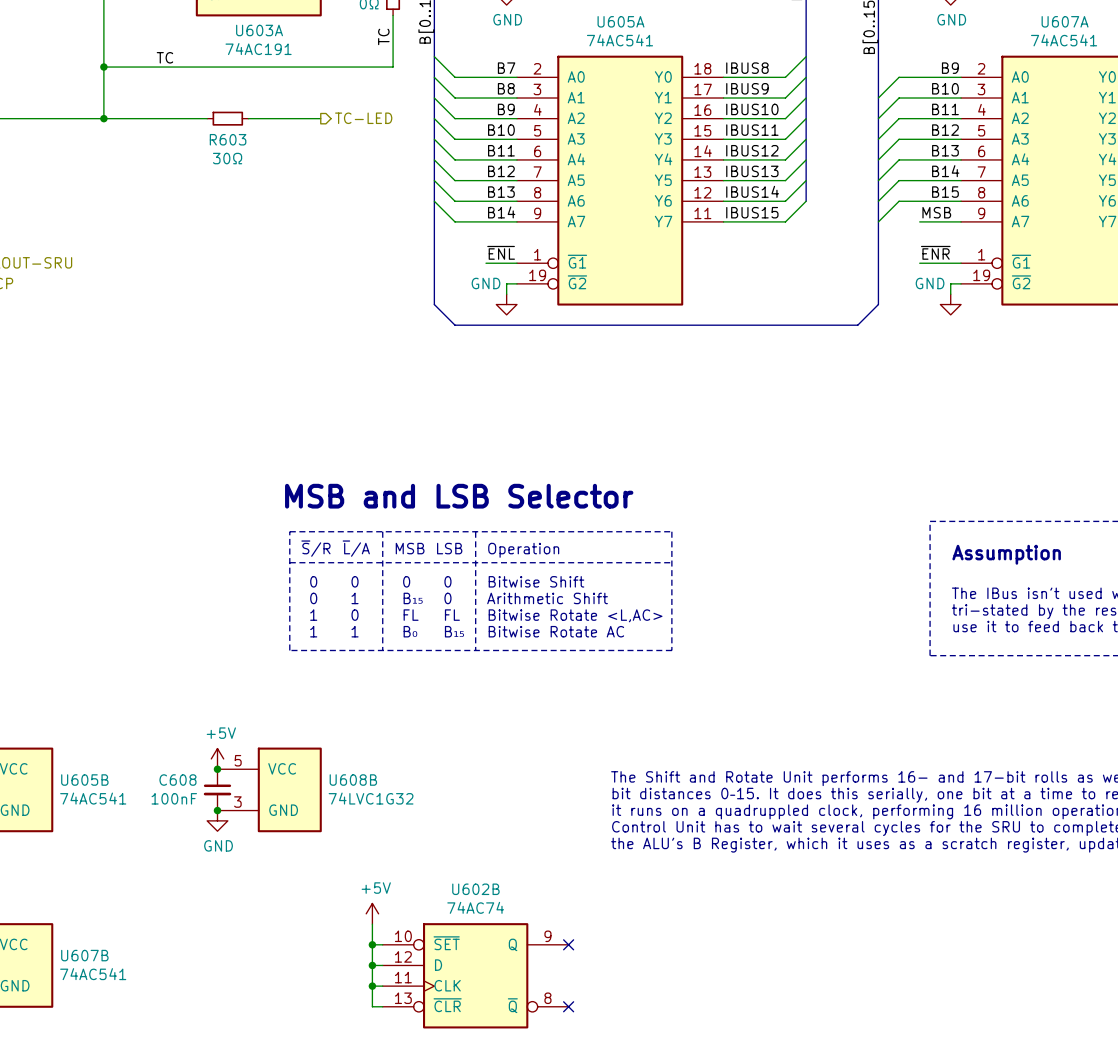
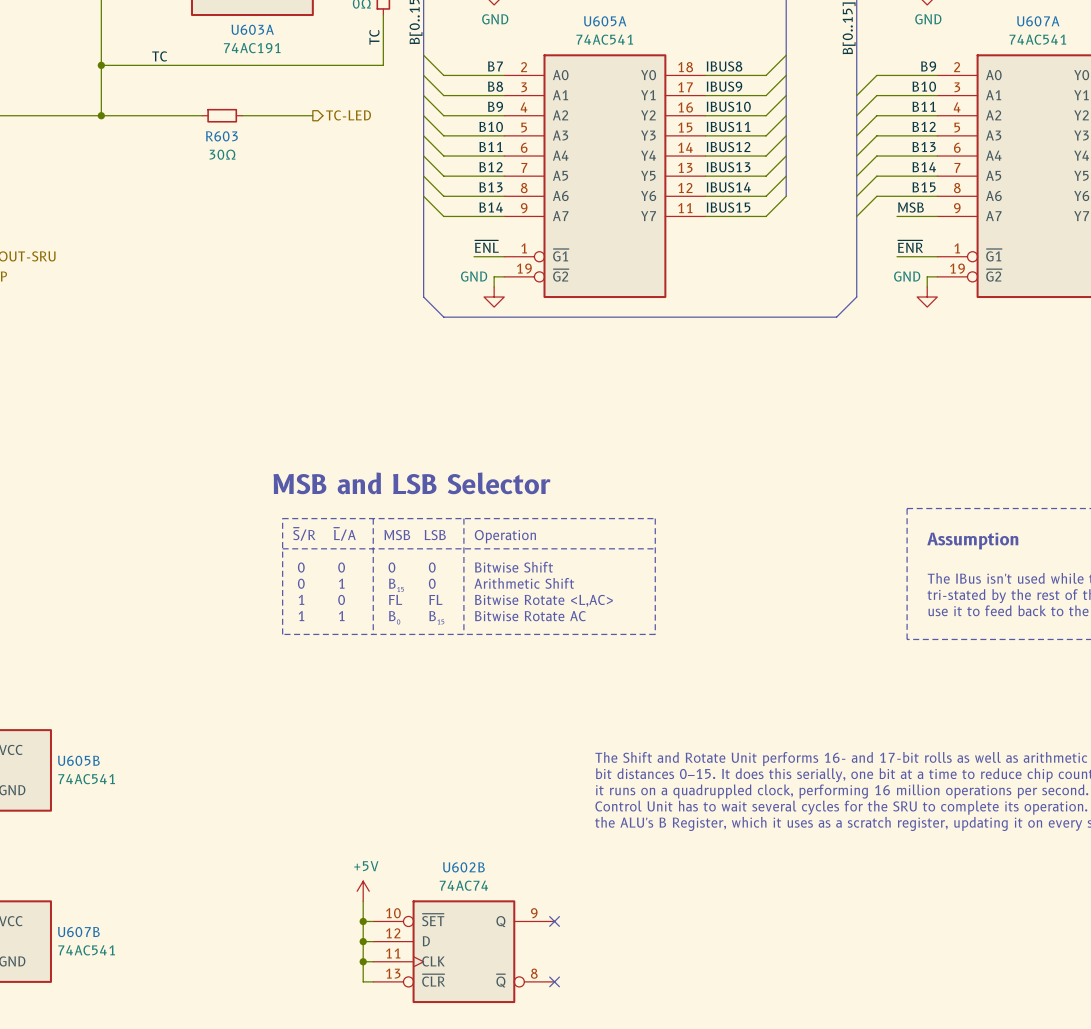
power symbol: +5V (217, 758) -> none
junction: (217, 769) -> none
C608: 100nF (217, 789) -> none
U608B: 74LVC1G32 (269, 789) -> none
junction: (217, 810) -> none
power symbol: GND (217, 820) -> none

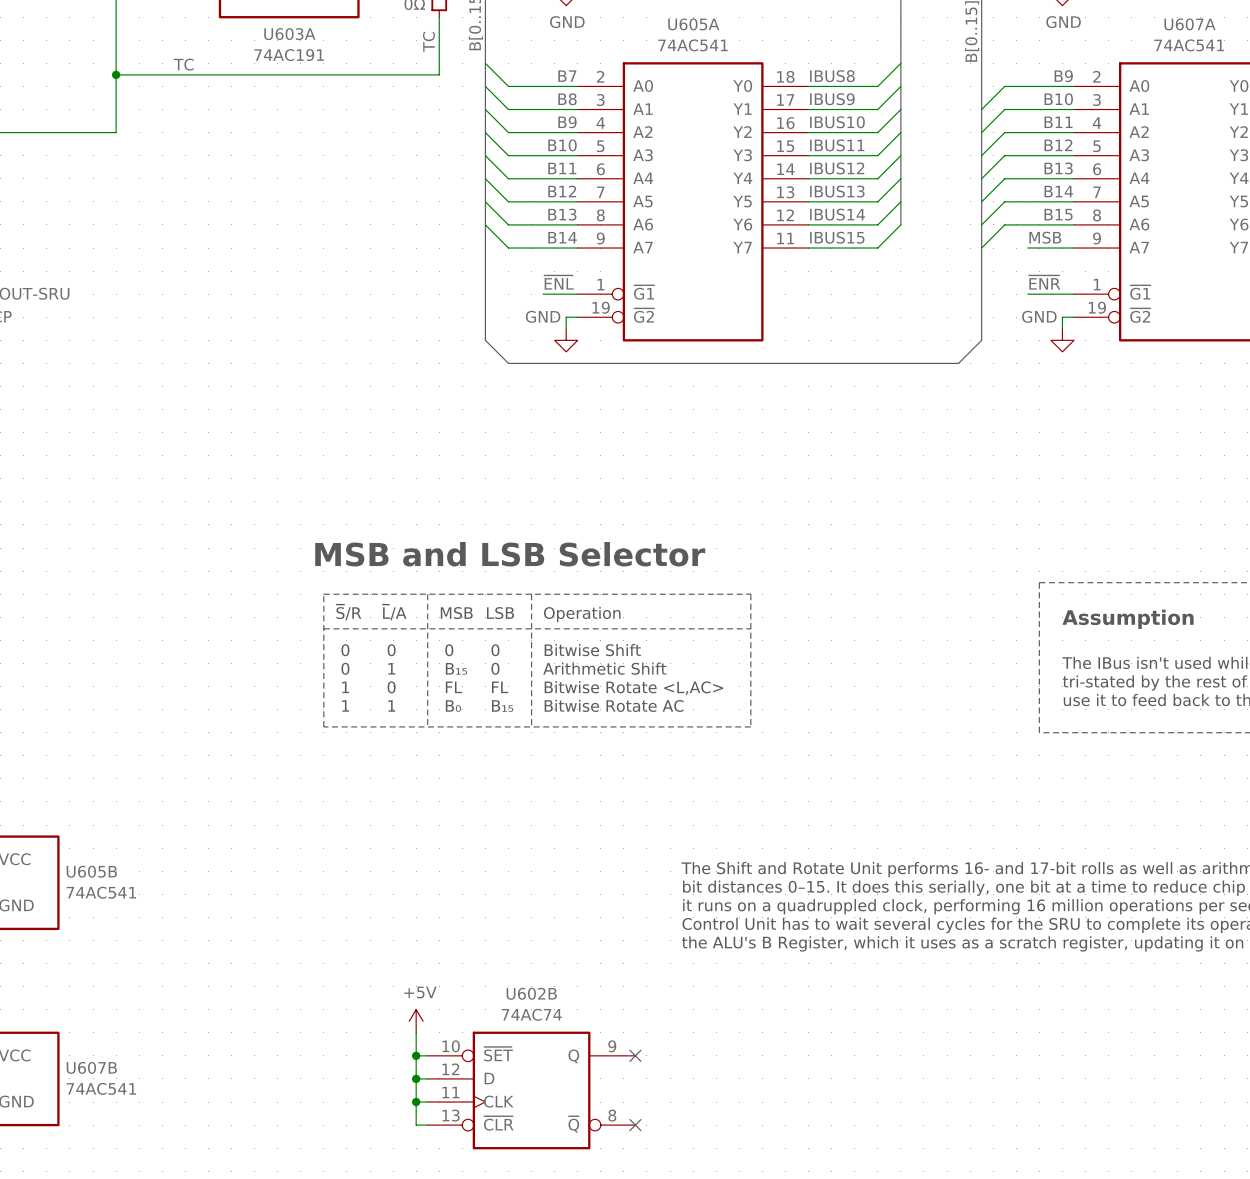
wire: (101, 115) (202, 115) -> none
junction: (101, 115) -> none
R603: 30Ω (222, 115) -> none
wire: (242, 115) (312, 115) -> none
hierarchical label: TC-LED (348, 115) -> none

